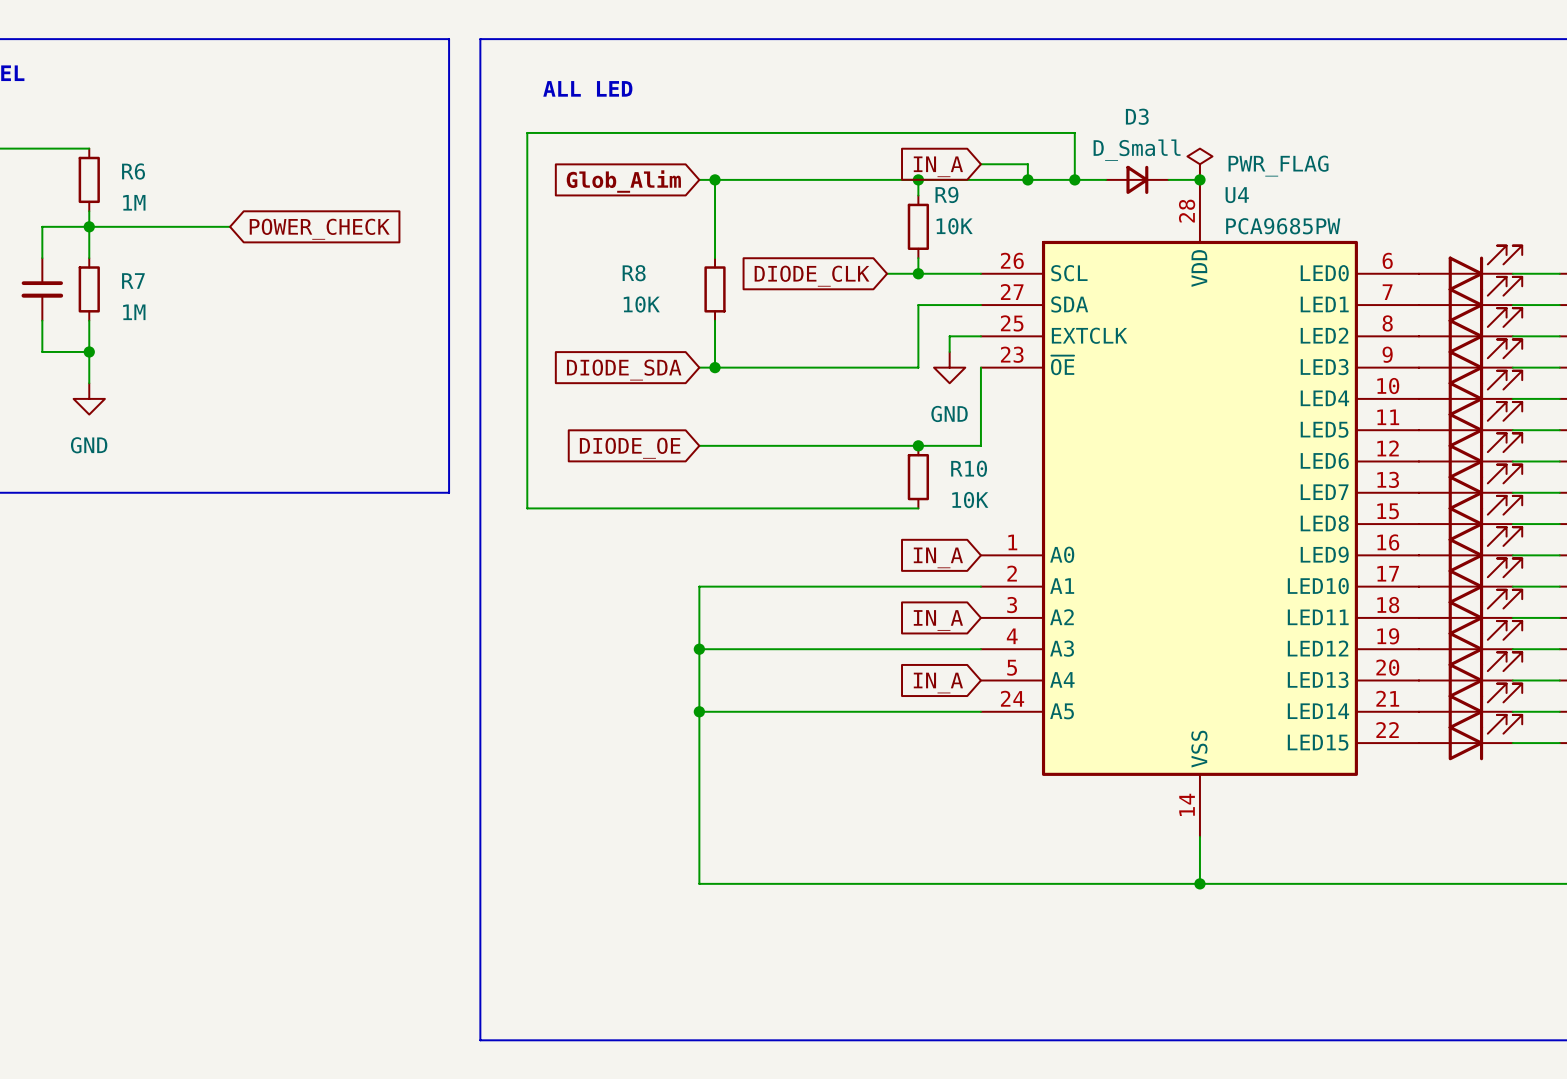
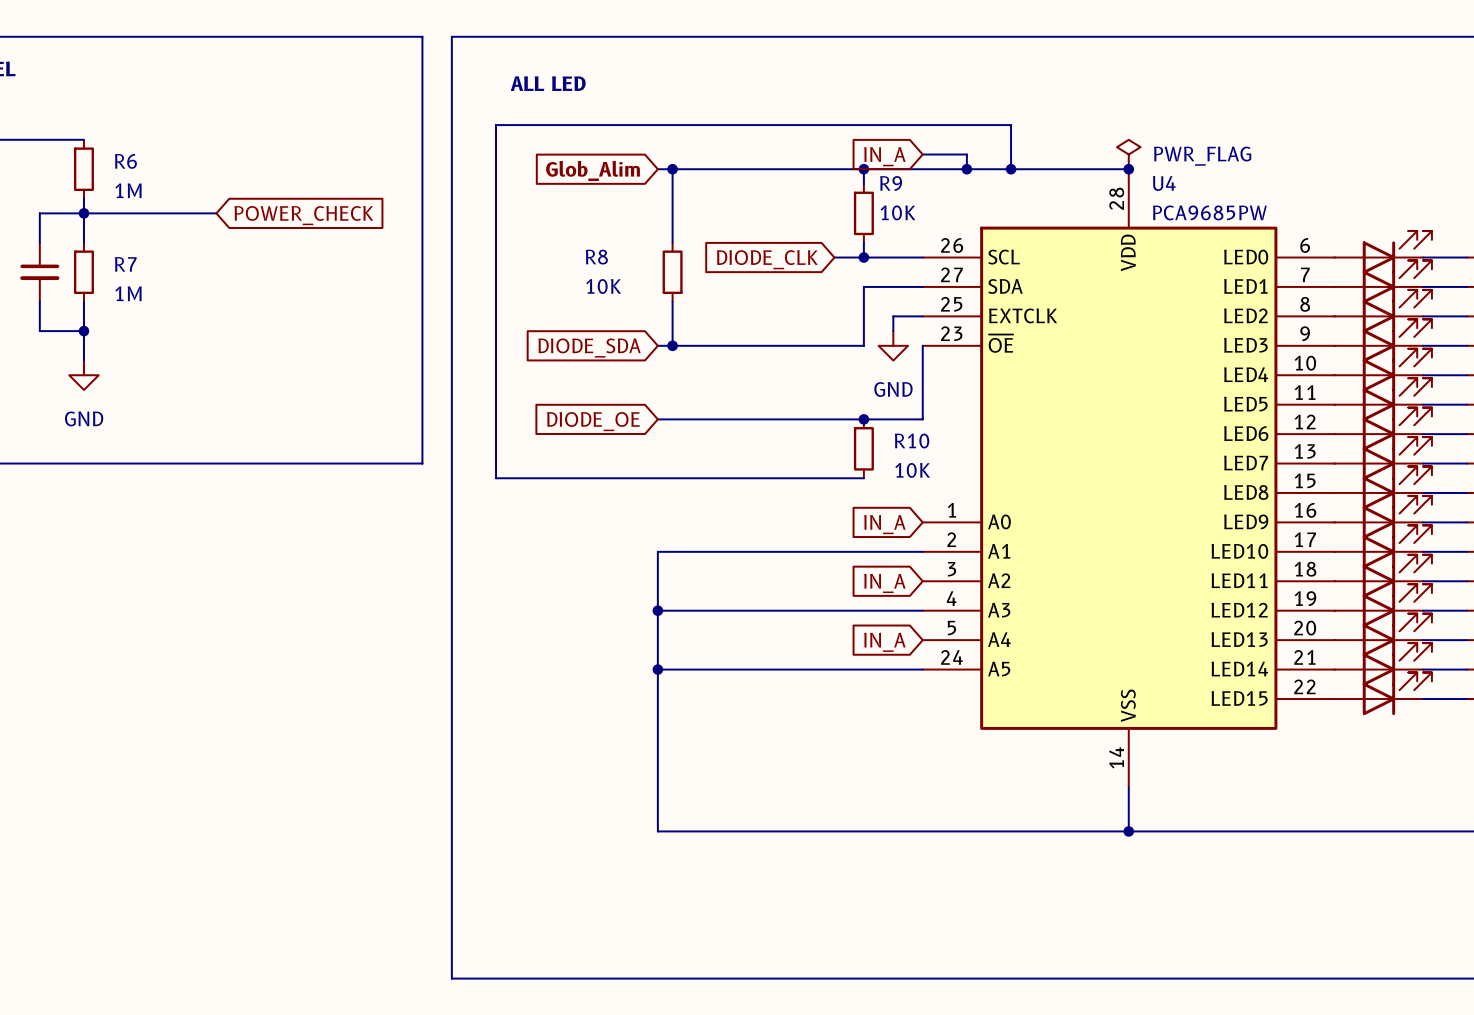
D3: D_Small (1137, 179) -> none

